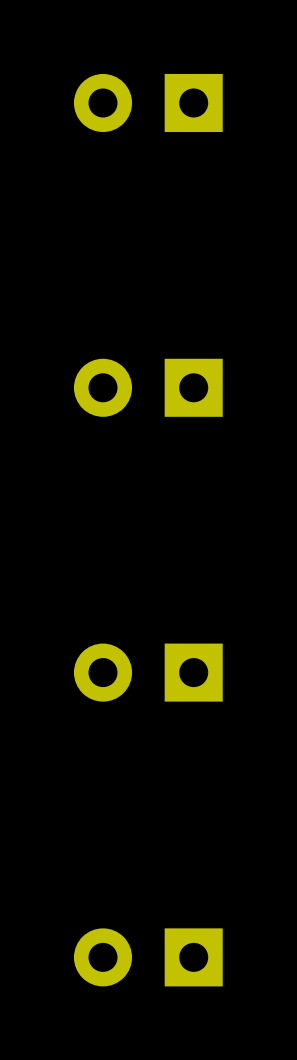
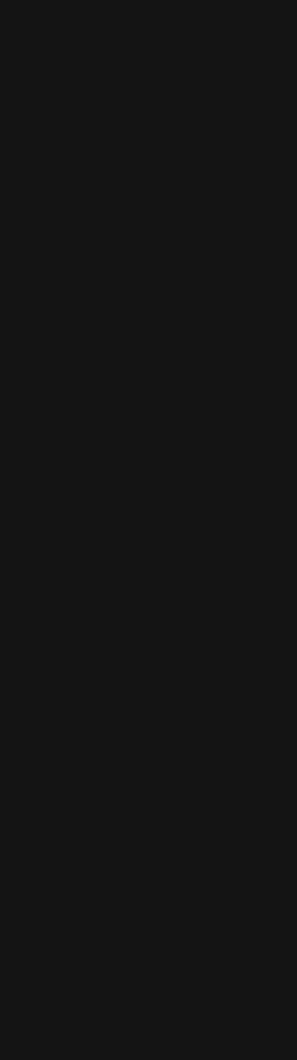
part: (148, 102) -> none
part: (148, 387) -> none
part: (148, 672) -> none
part: (148, 957) -> none

